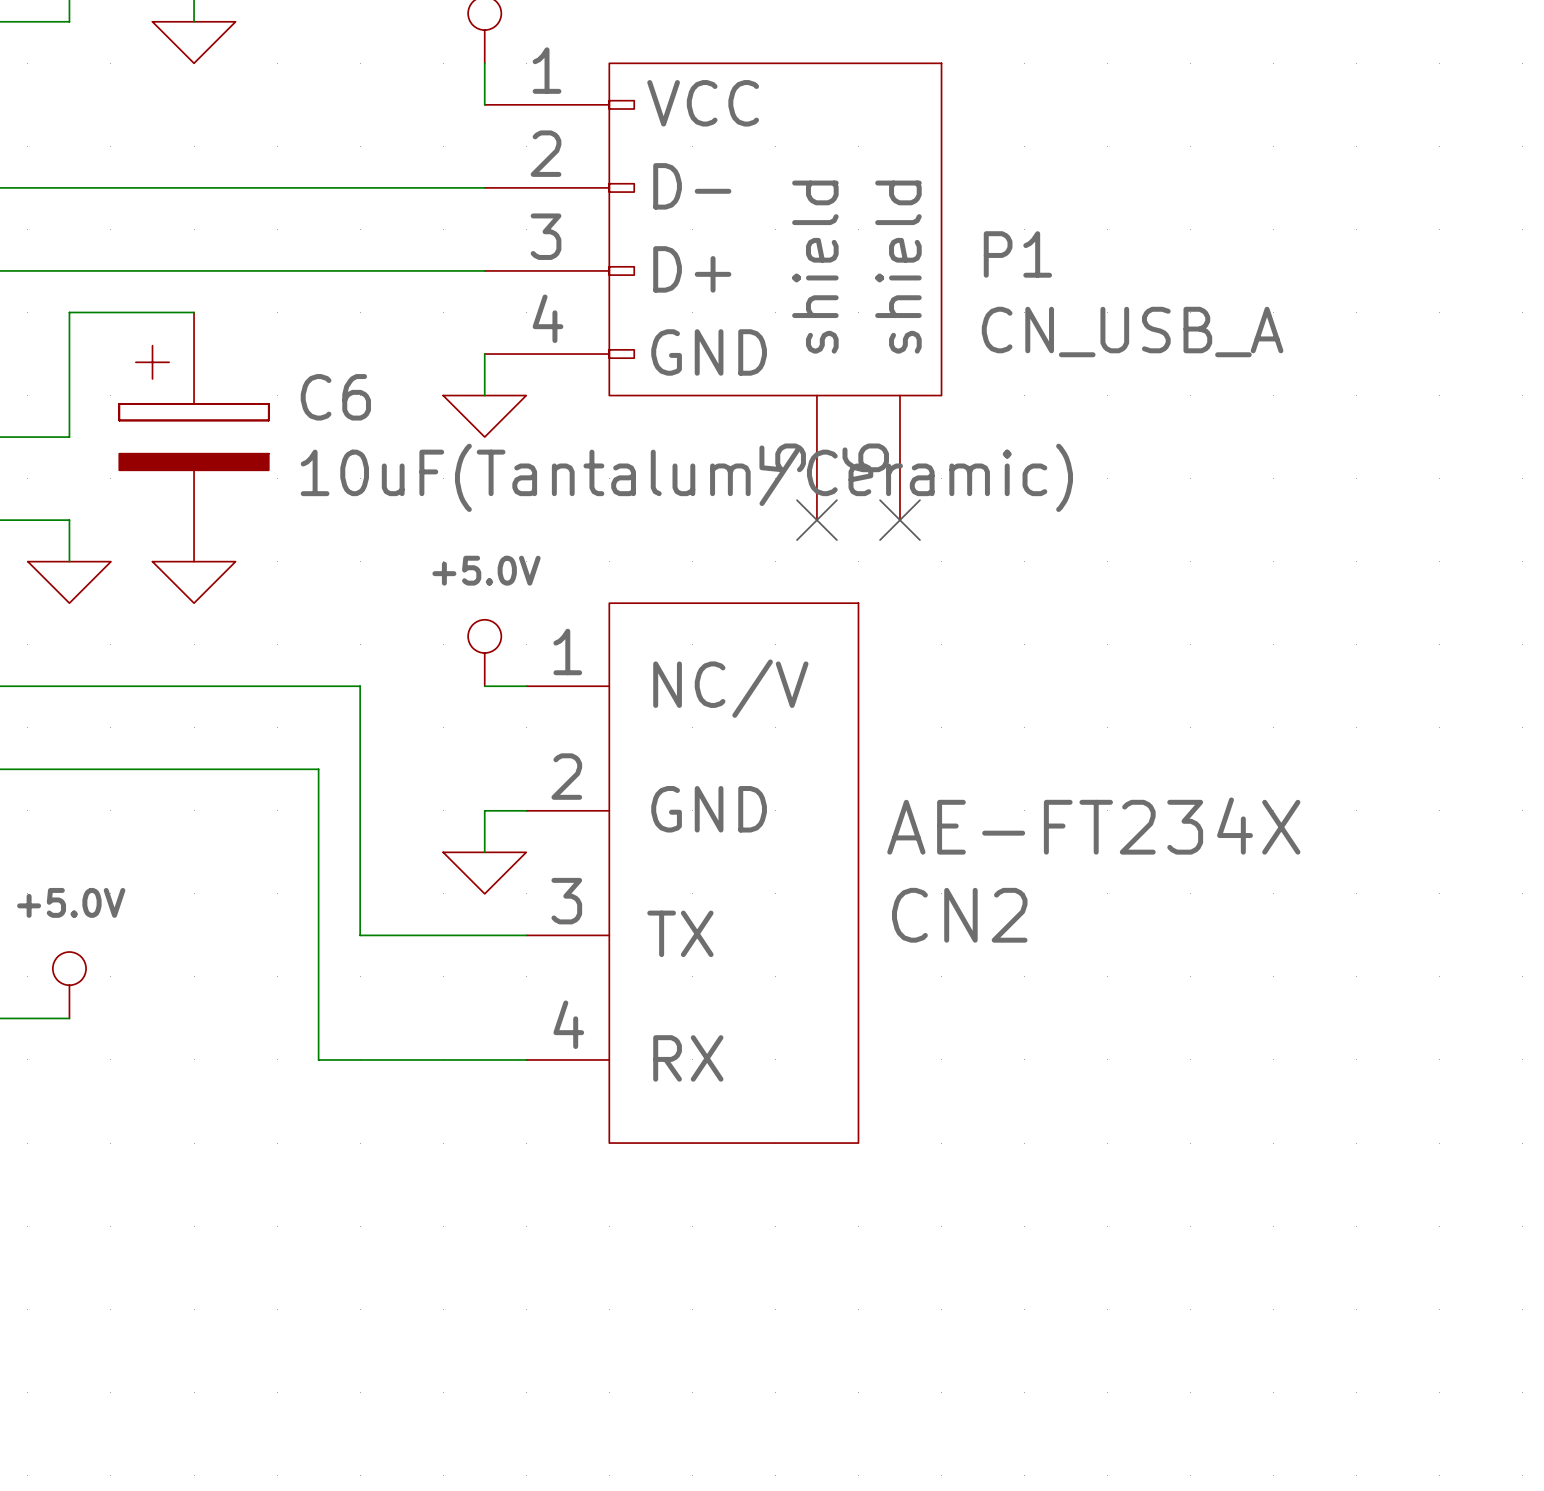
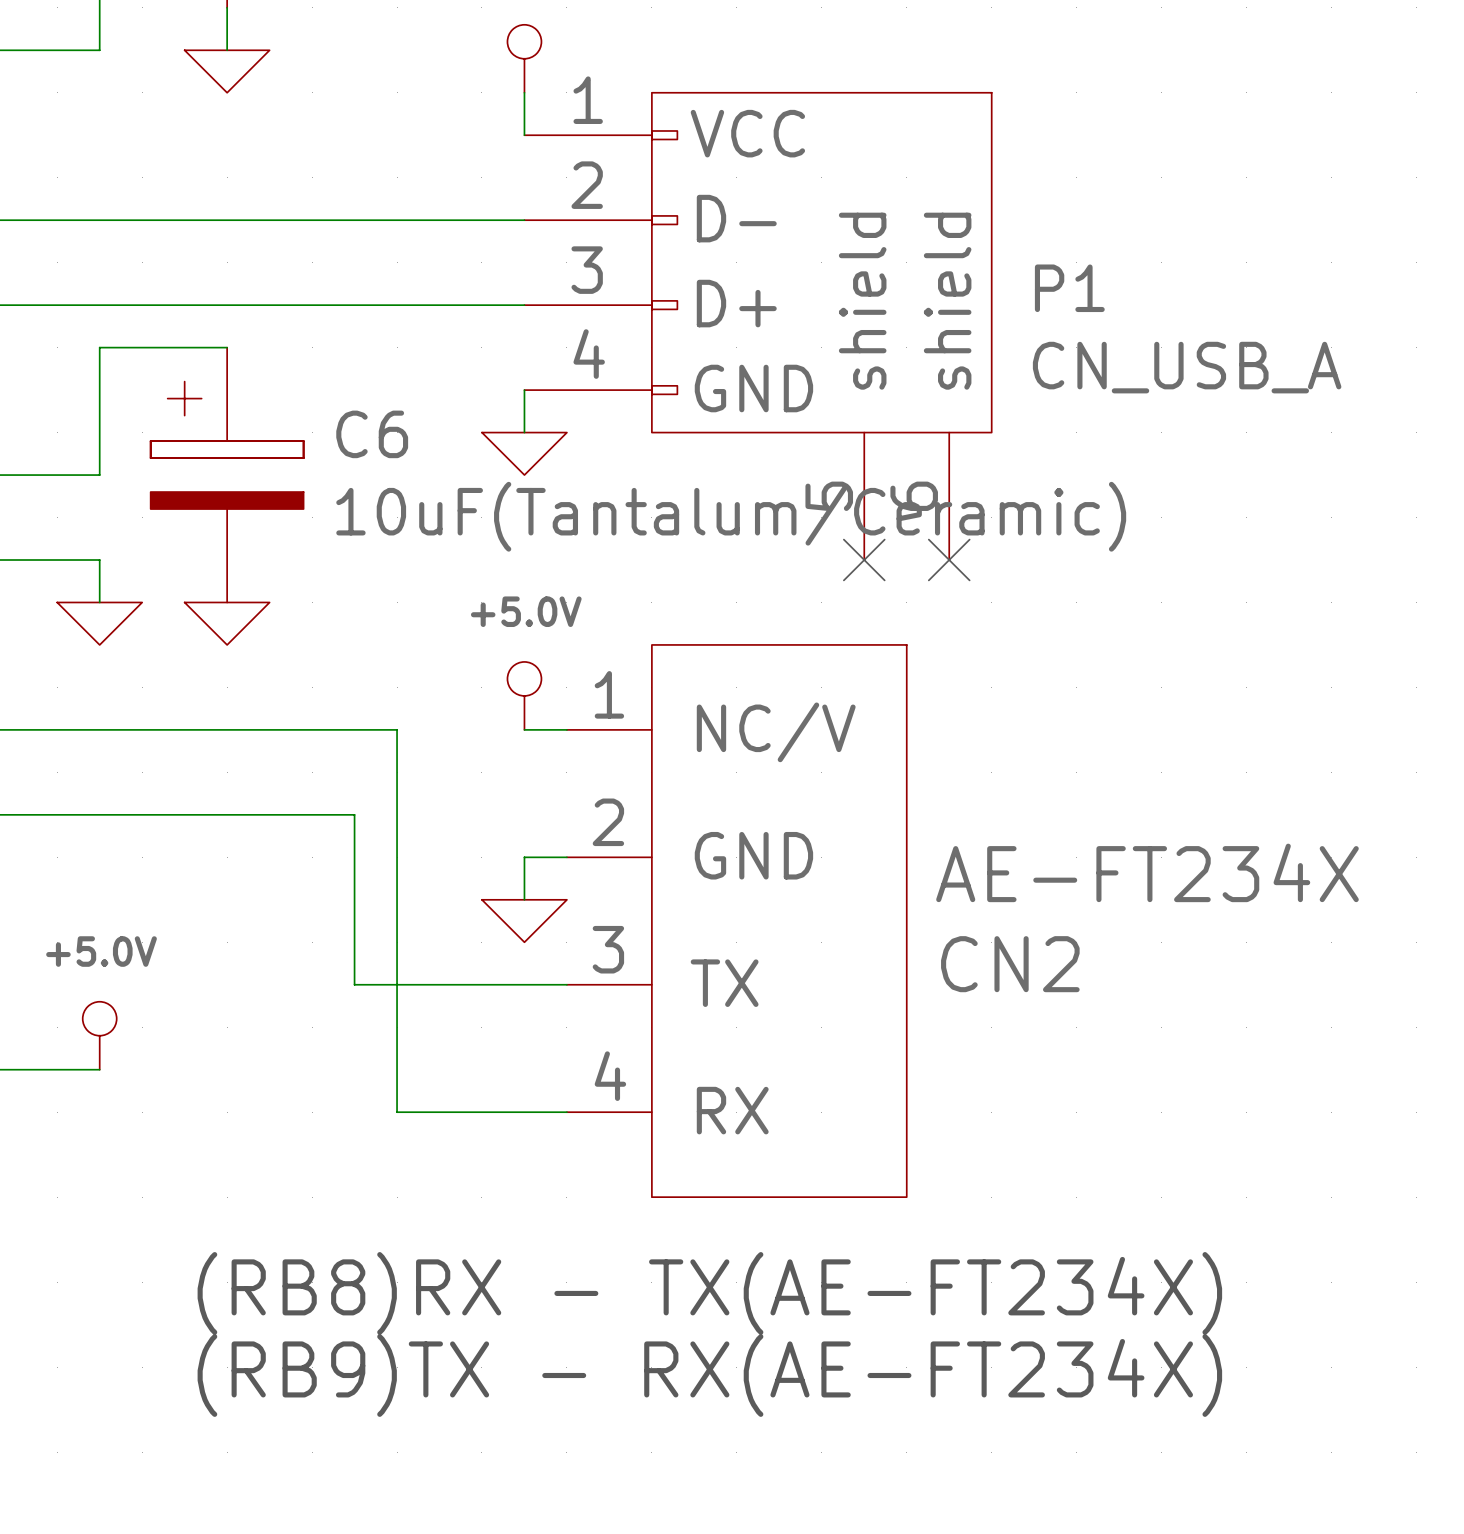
wire: (318, 935) (318, 1059) (360, 1059) -> (354, 984) (397, 984) (397, 1112)
text: none -> (RB8)RX - TX(AE-FT234X) (709, 1293)
text: none -> (RB9)TX - RX(AE-FT234X) (709, 1375)

